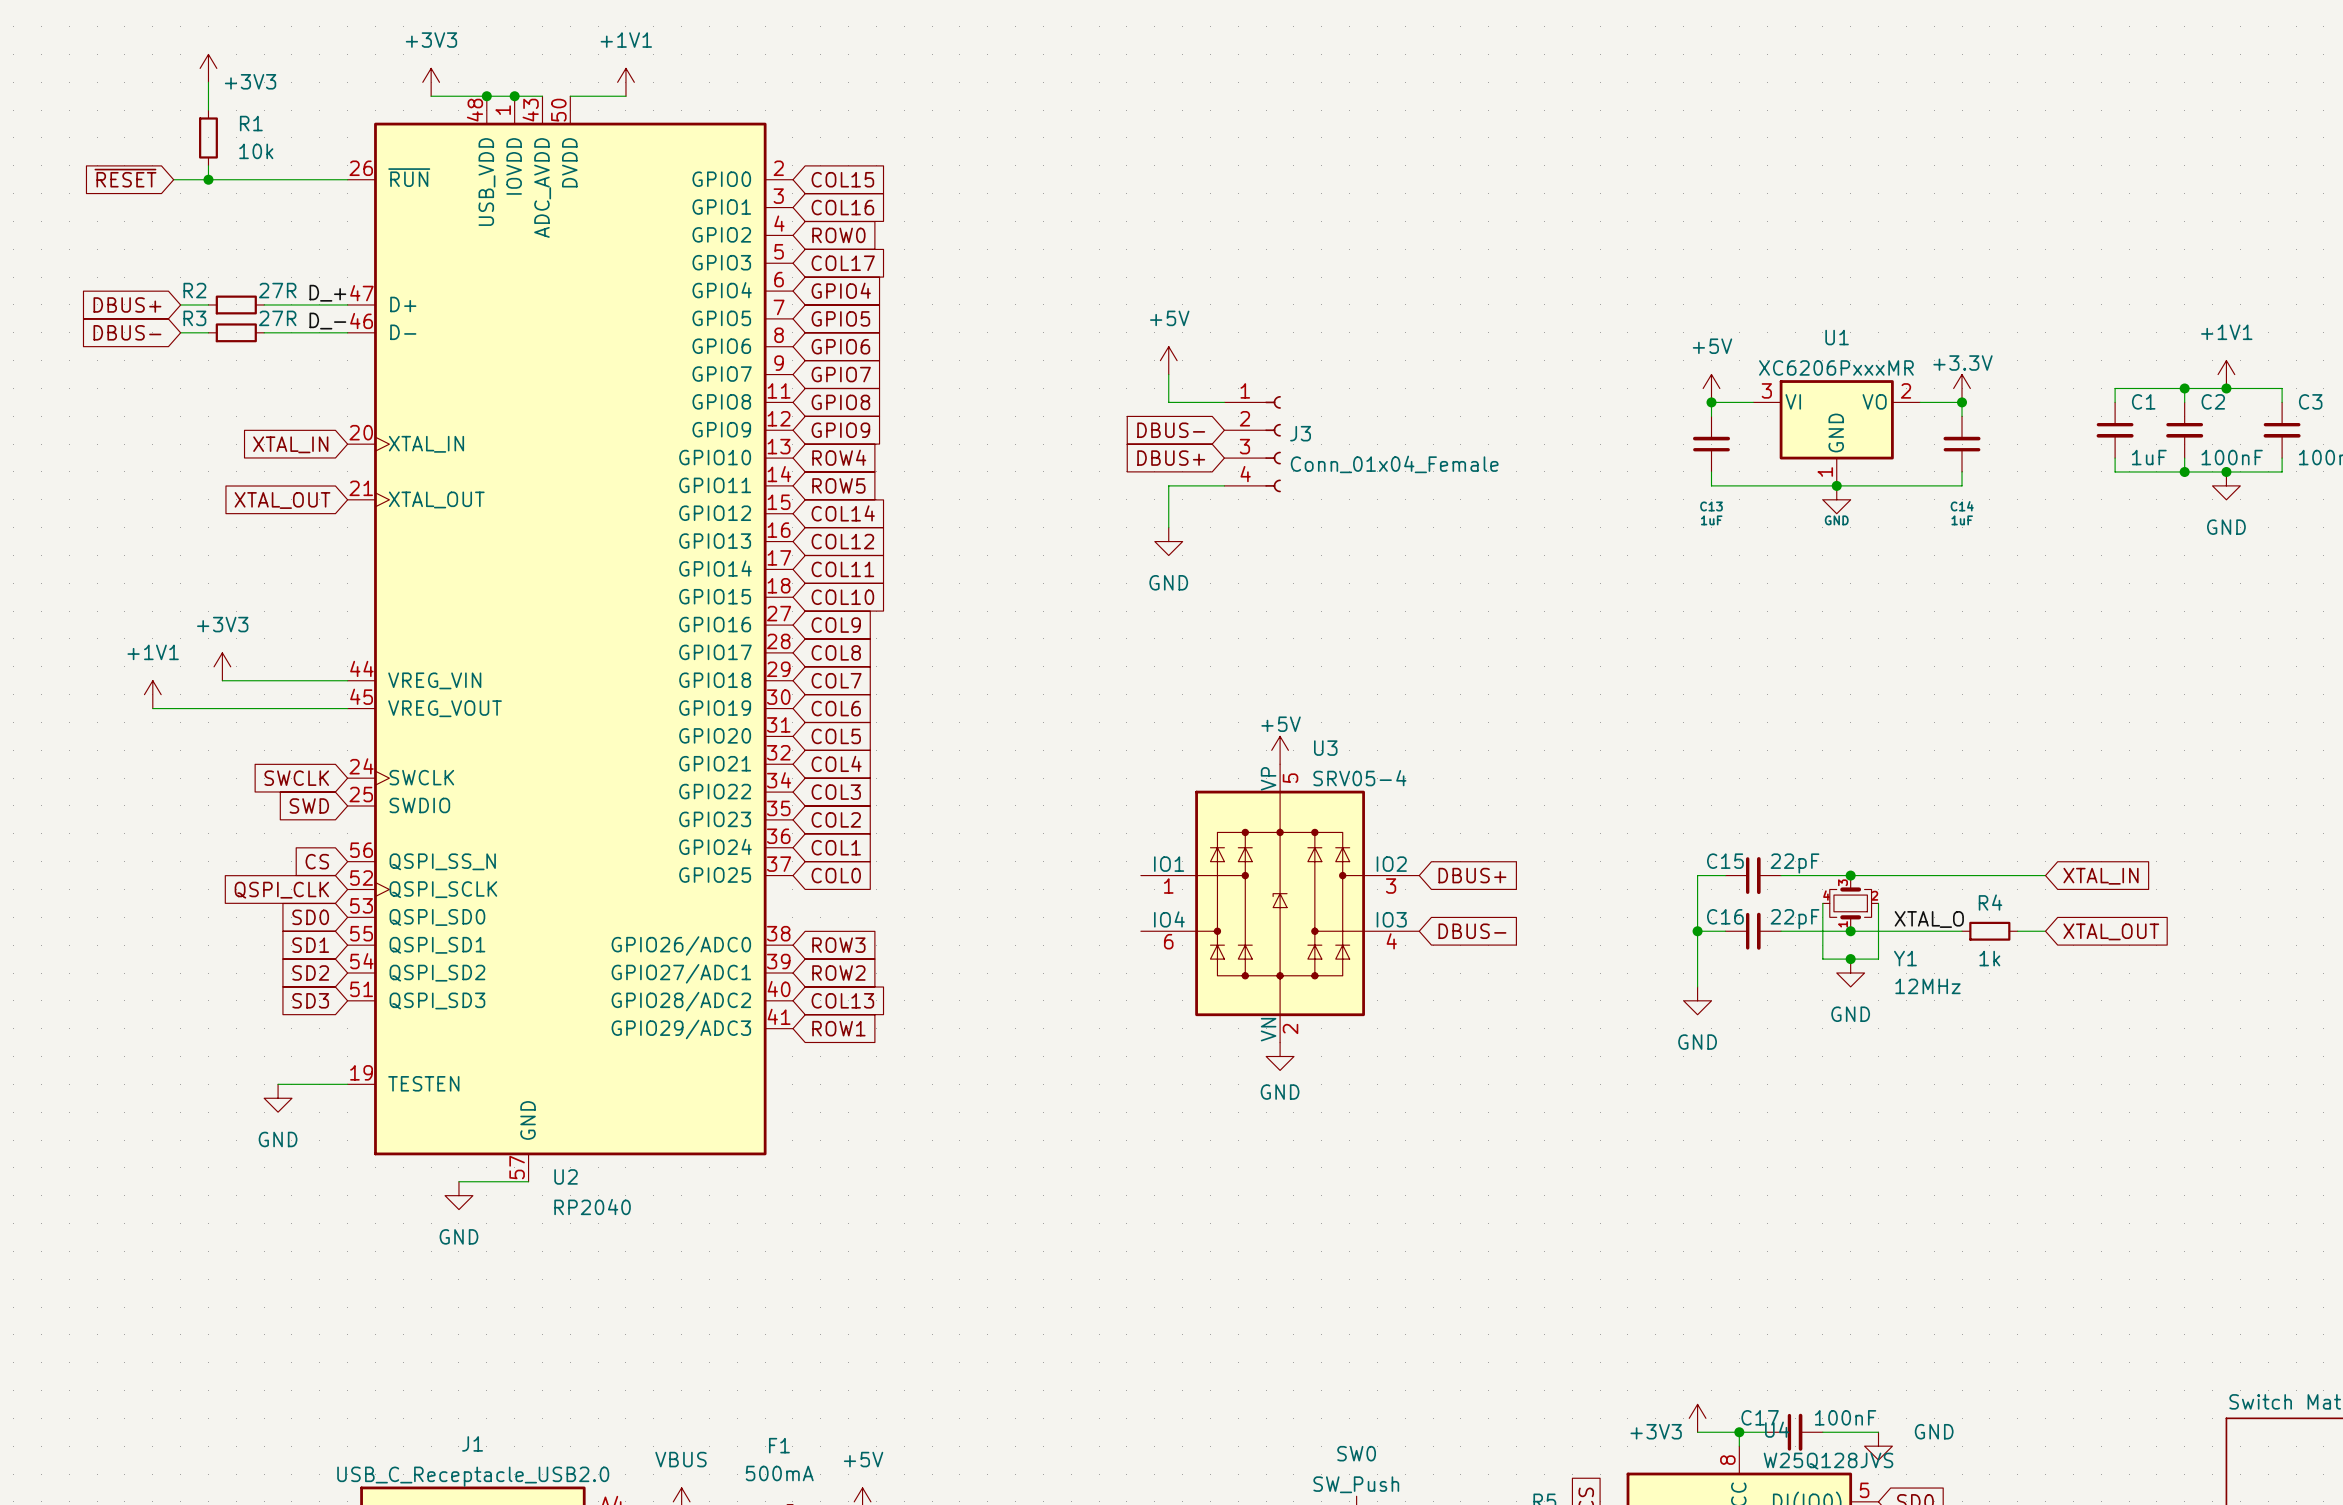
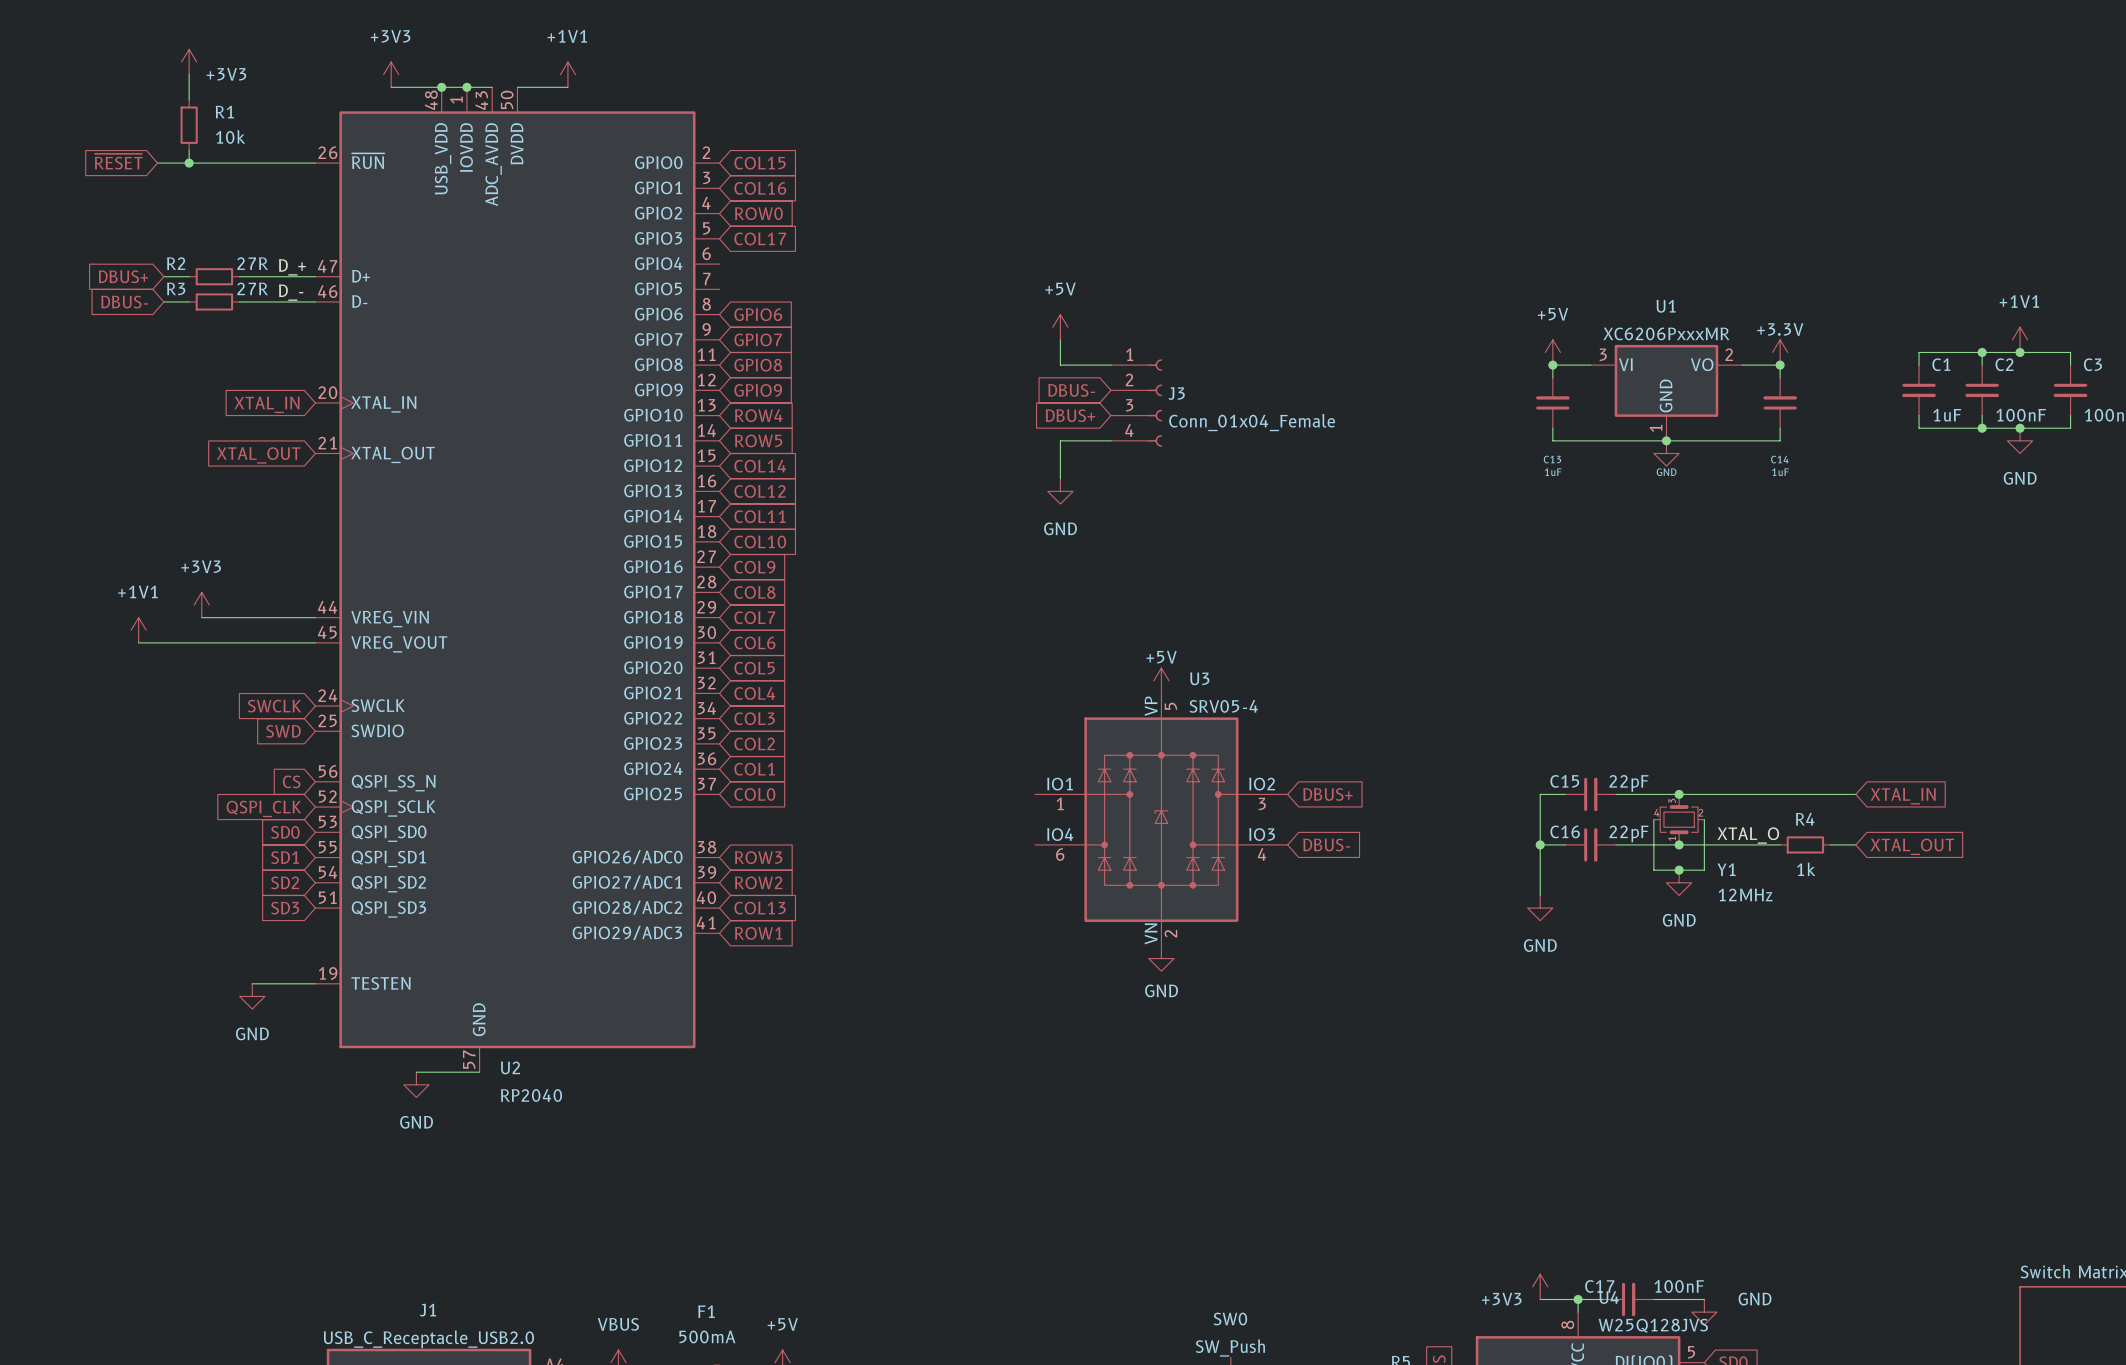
global label: GPIO4 (841, 290) -> none
global label: GPIO5 (840, 318) -> none

